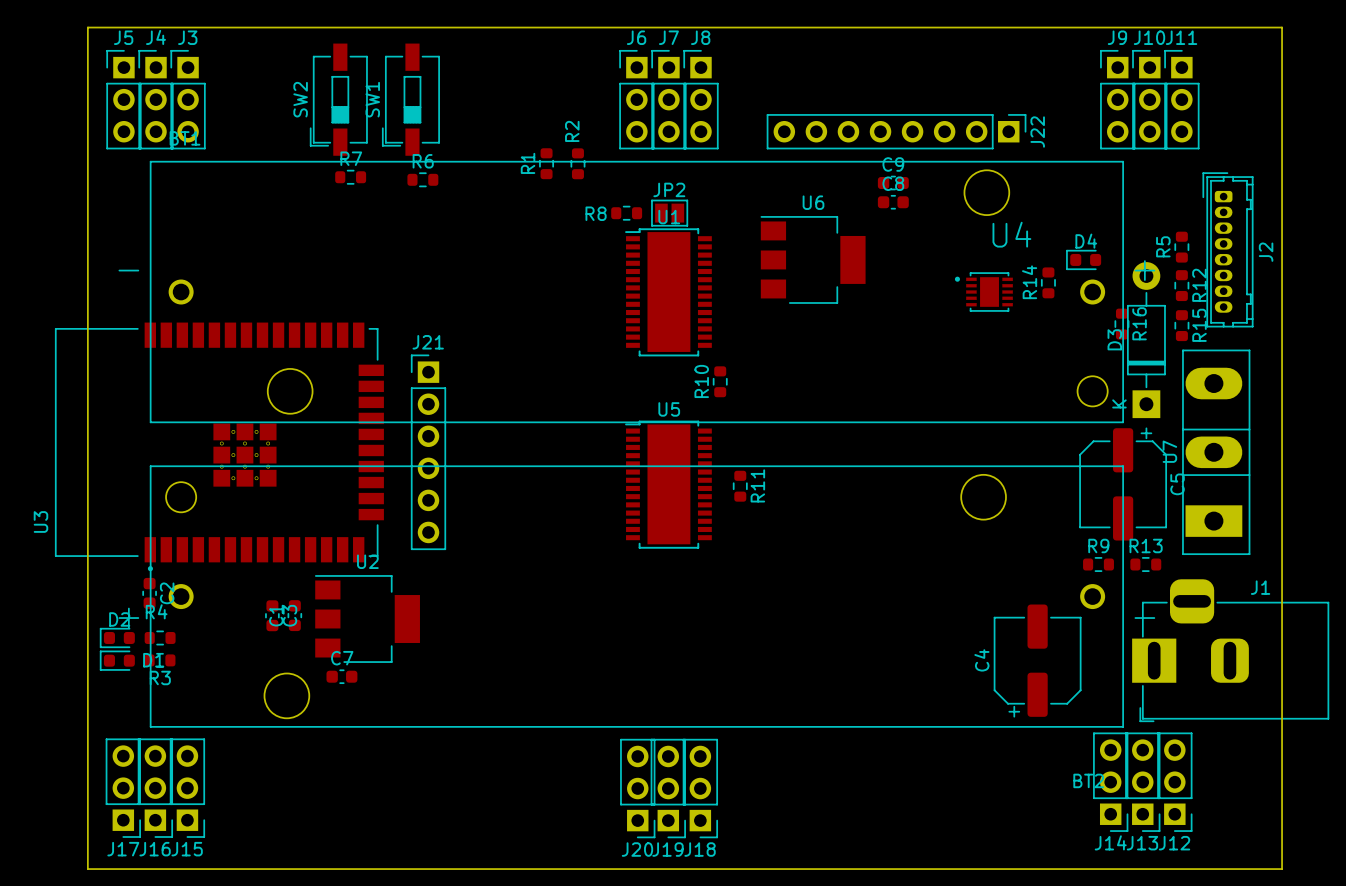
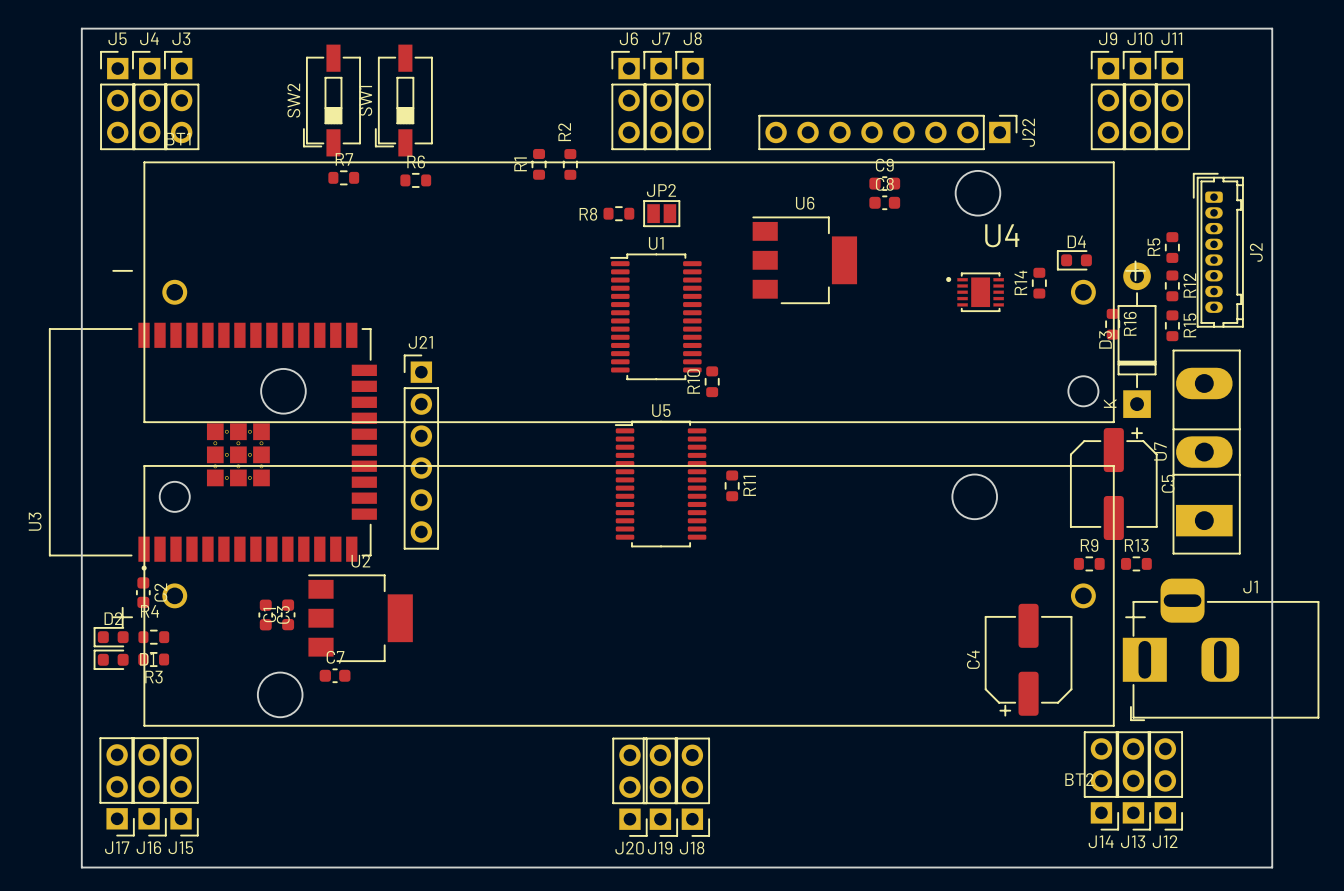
U1 footprint: [625, 228, 712, 357] -> [610, 253, 702, 380]
U5 footprint: [625, 420, 712, 549] -> [614, 420, 707, 548]

